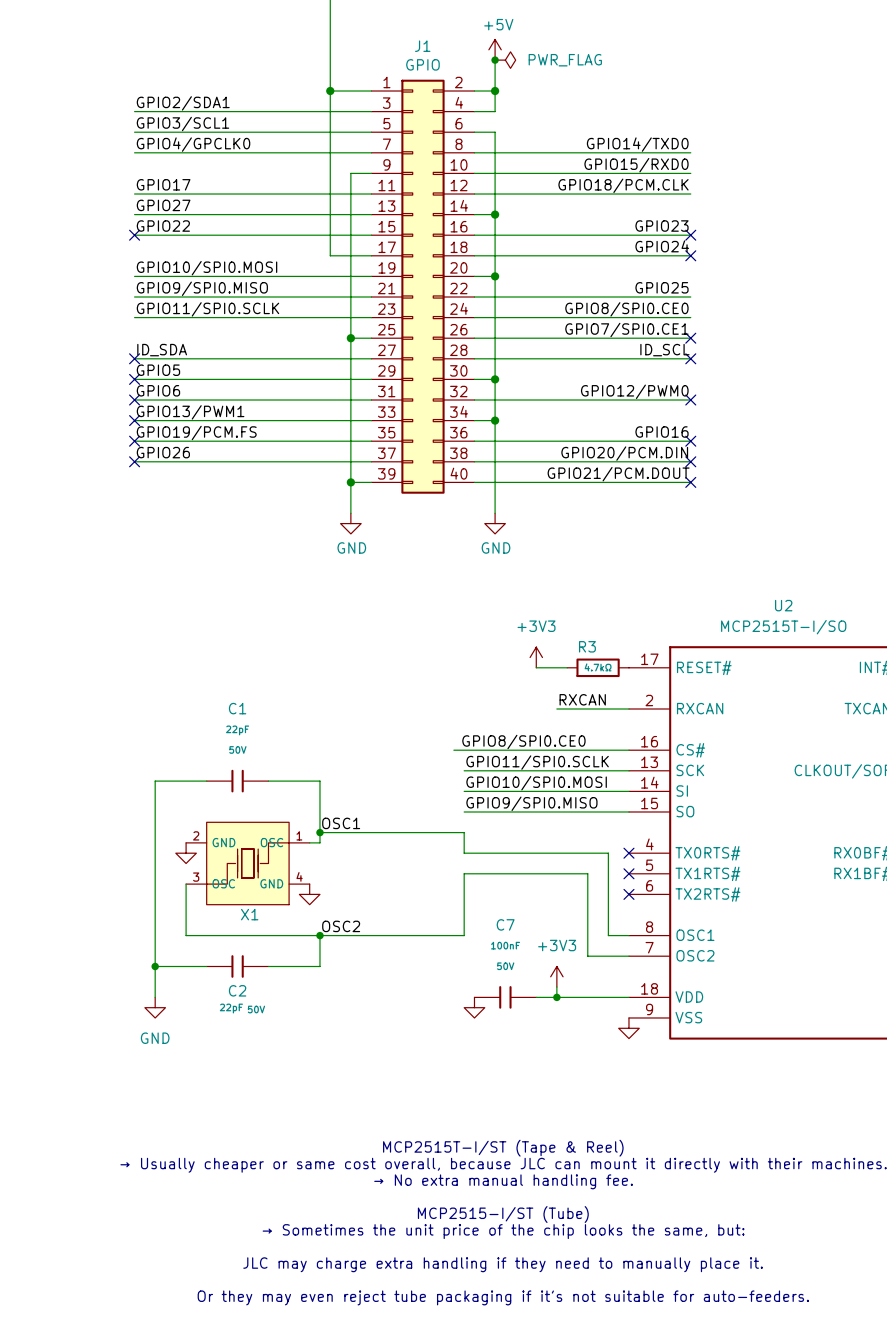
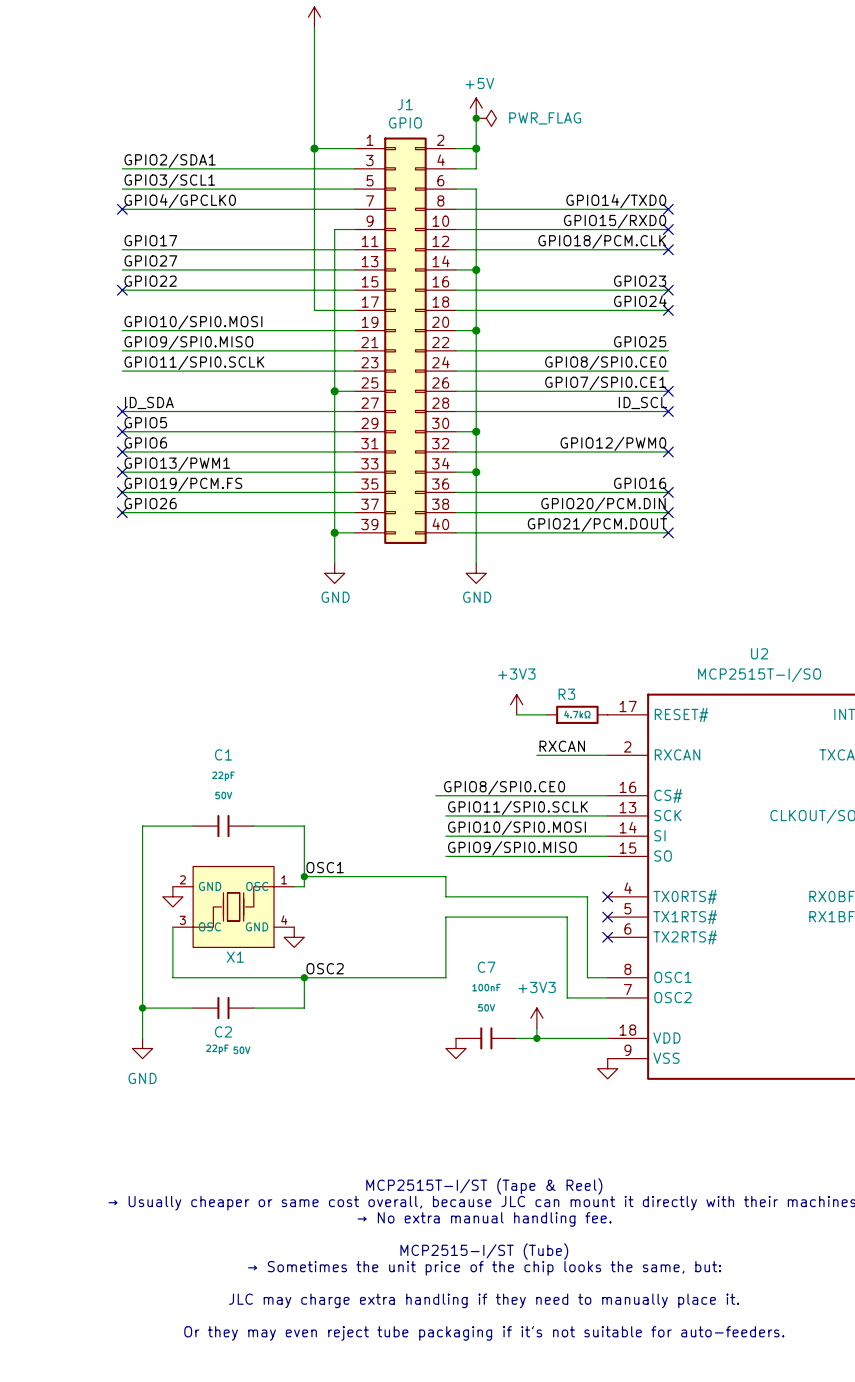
no-connect mark: none -> (122, 209)
no-connect mark: none -> (668, 209)
no-connect mark: none -> (668, 229)
no-connect mark: none -> (668, 249)

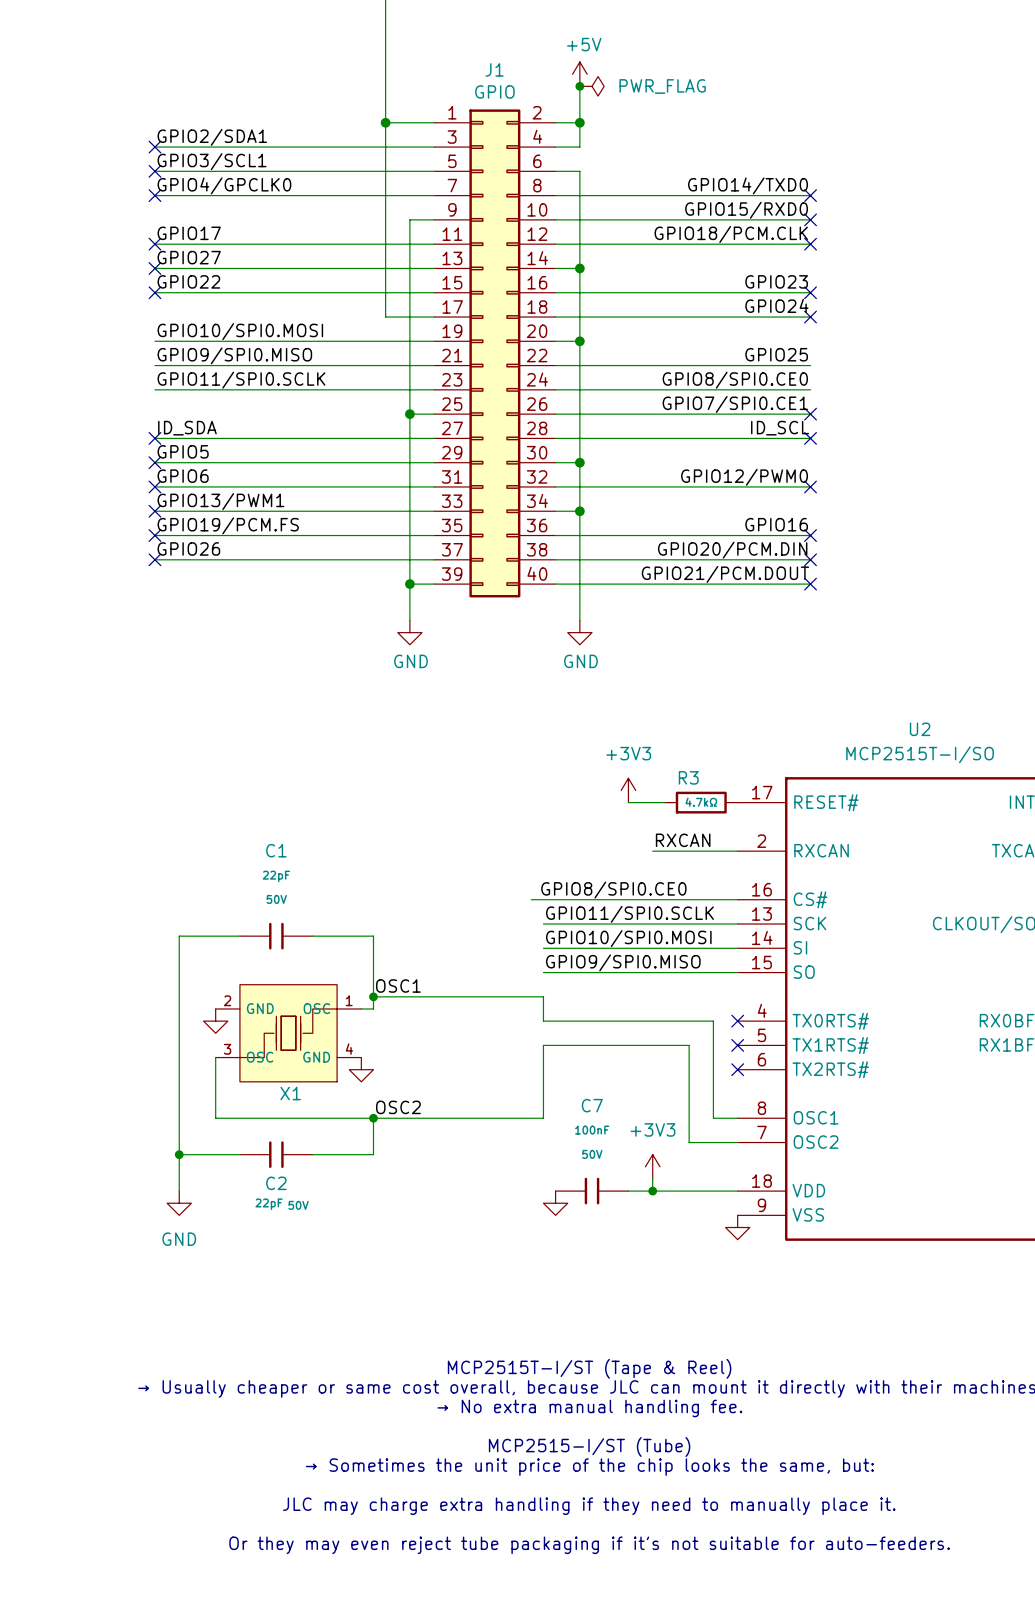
no-connect mark: none -> (154, 147)
no-connect mark: none -> (154, 171)
no-connect mark: none -> (154, 244)
no-connect mark: none -> (154, 268)

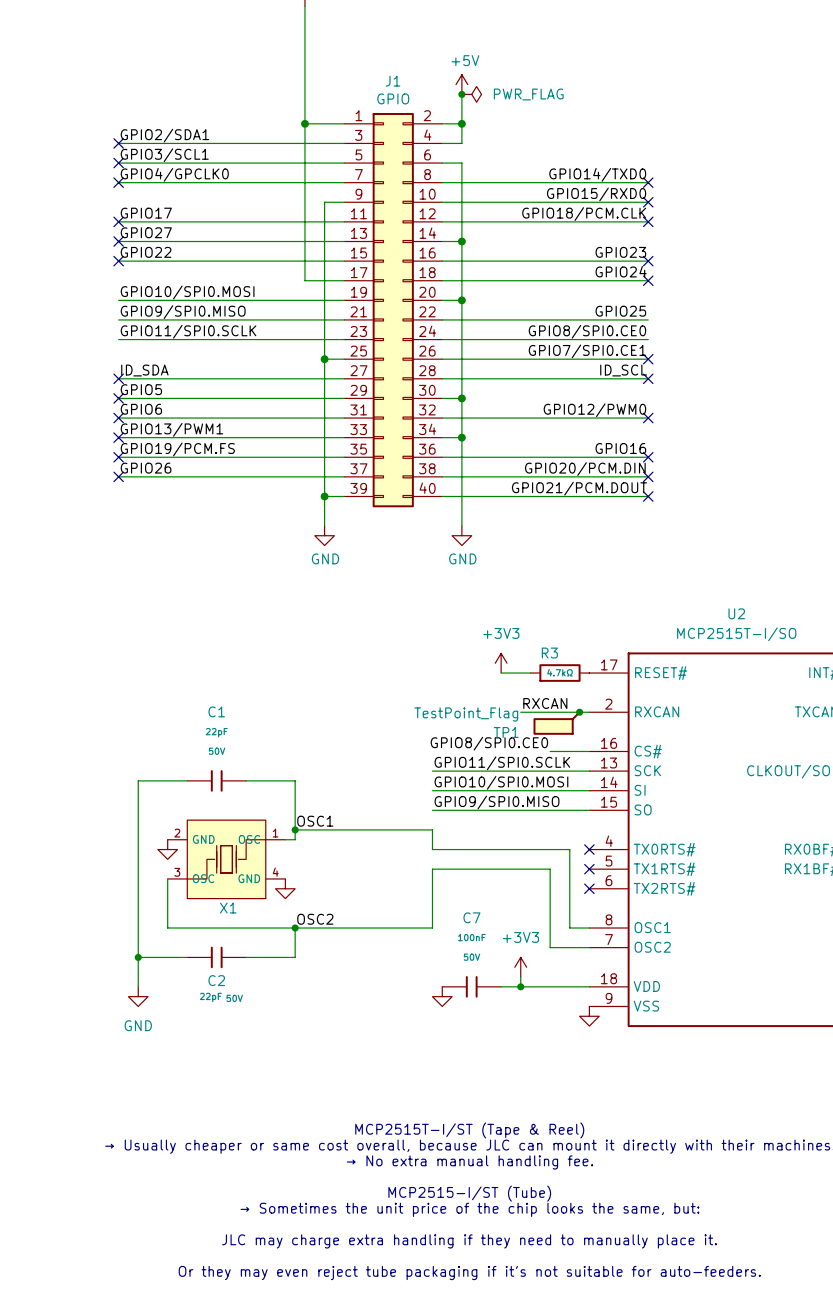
junction: none -> (579, 712)
TP1: none -> TestPoint_Flag (557, 723)
wire: (531, 899) (689, 899) -> none

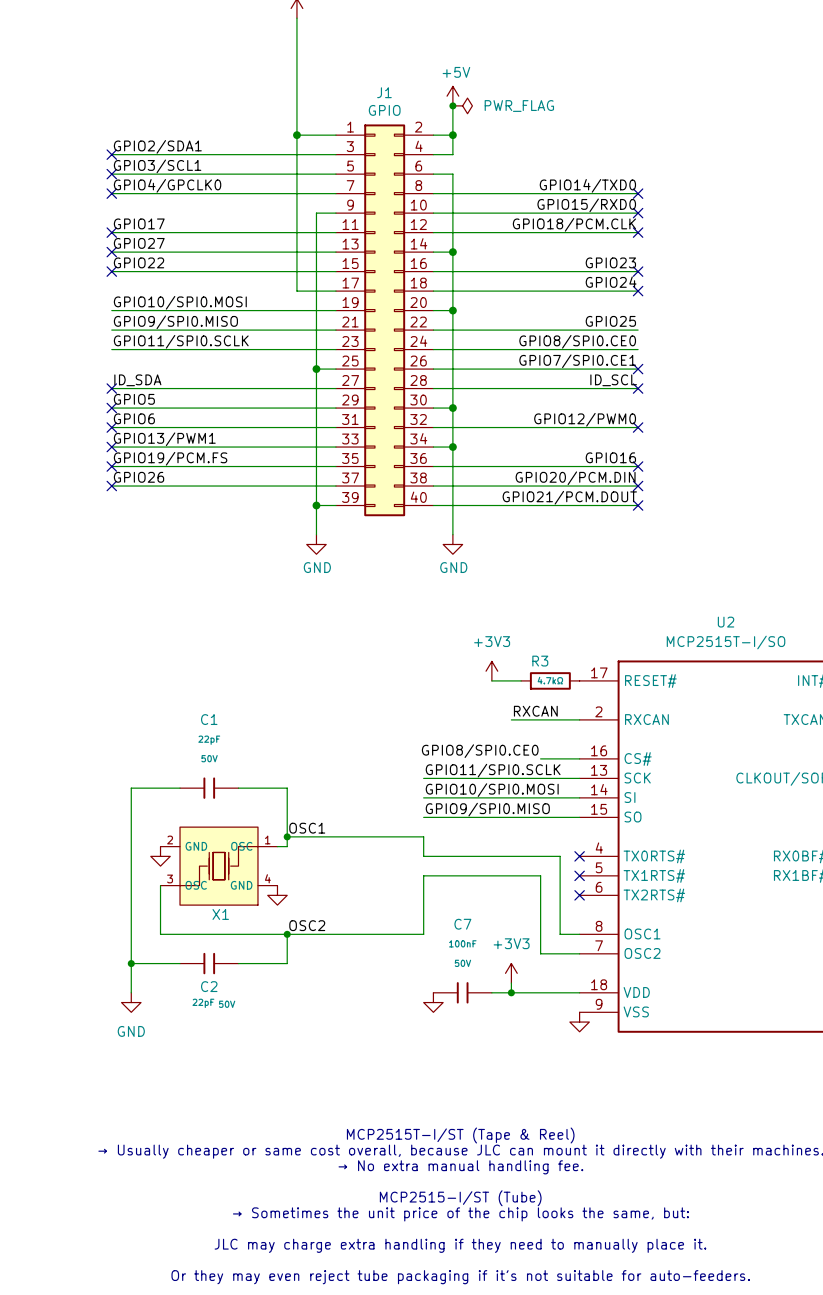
junction: (579, 712) -> none
TP1: TestPoint_Flag (557, 723) -> none

